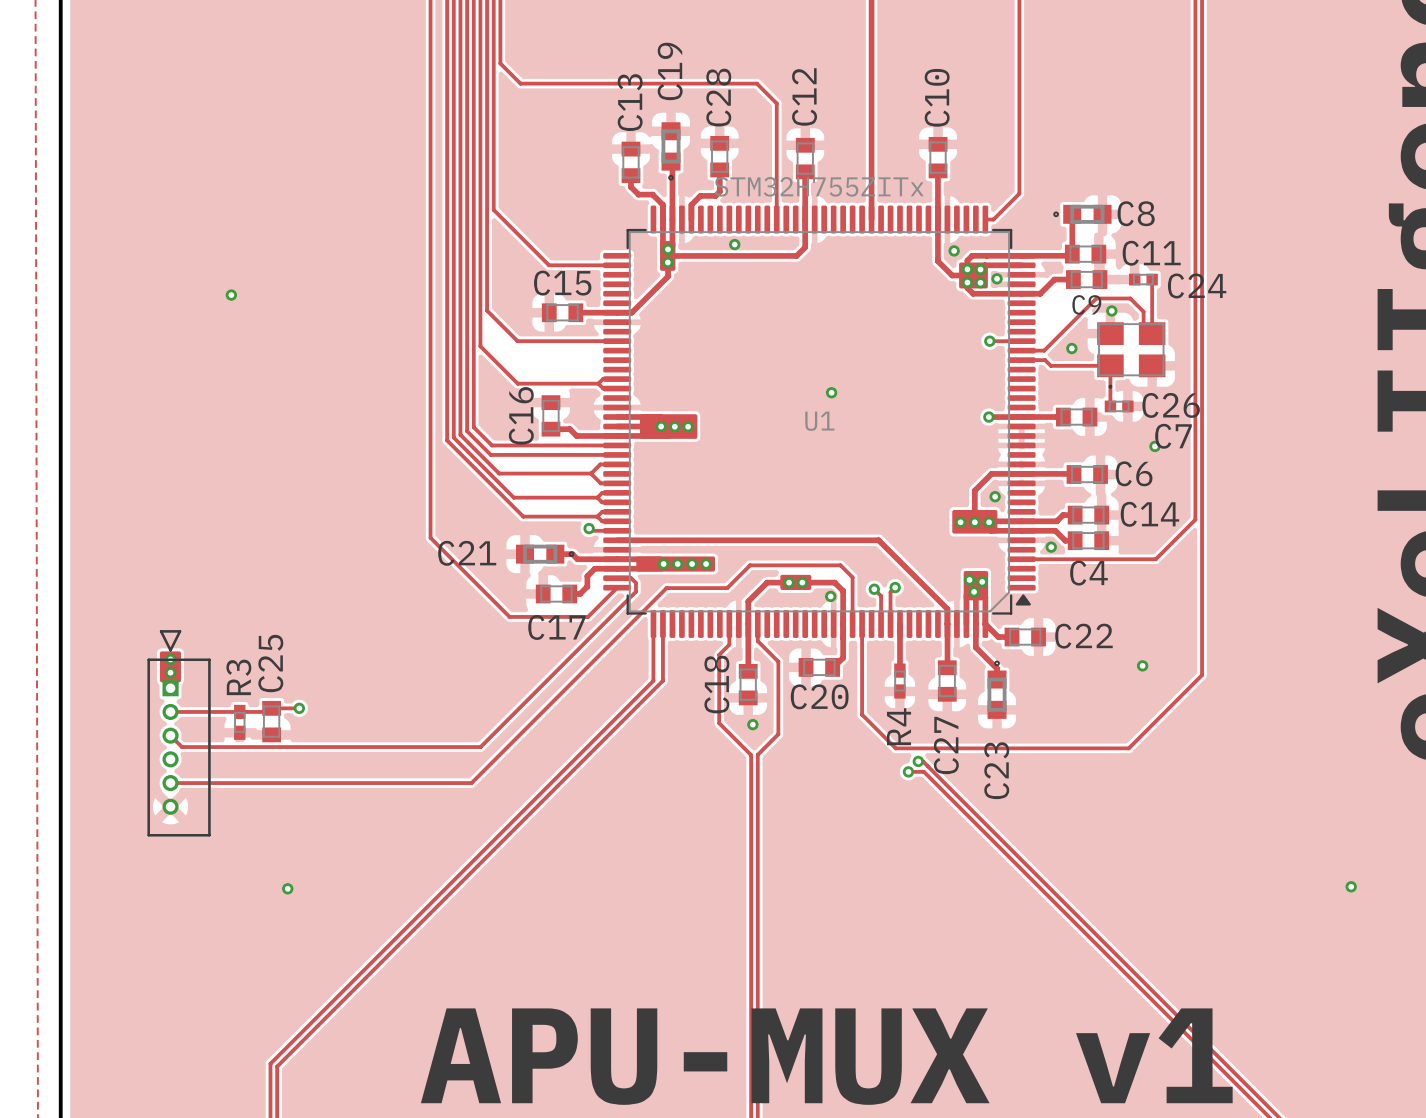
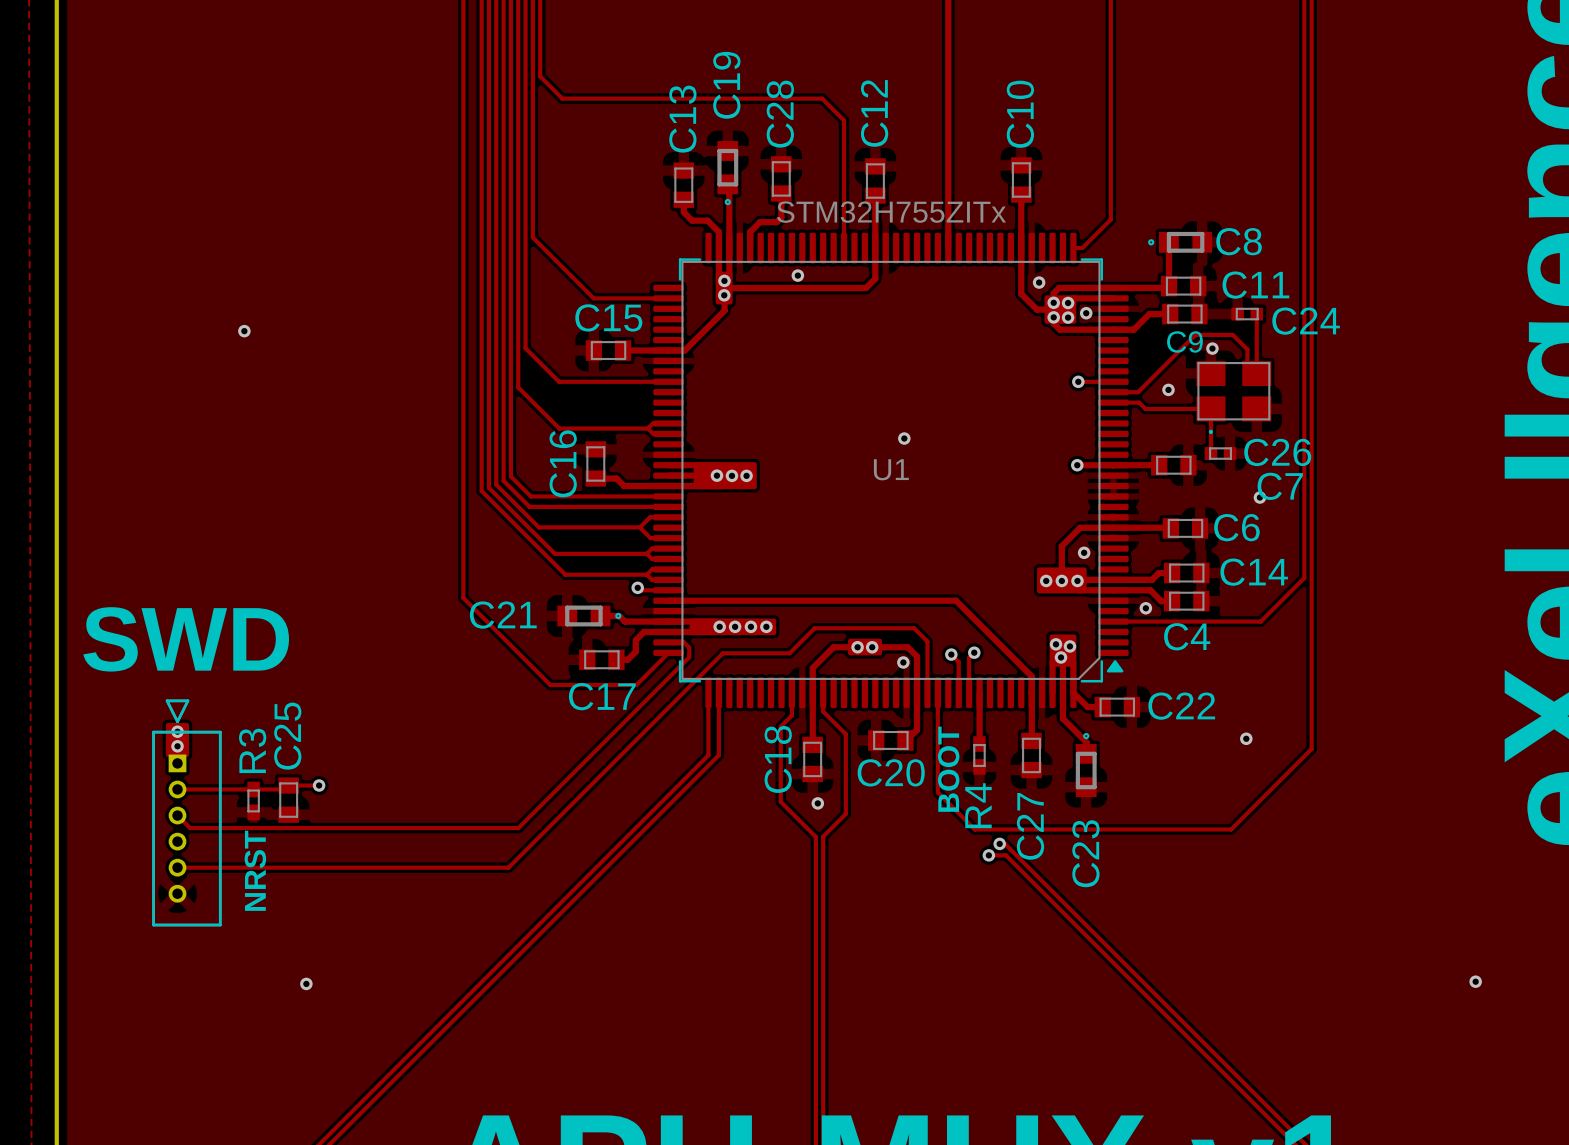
text: none -> SWD (186, 639)
text: none -> BOOT (948, 769)
text: none -> NRST (255, 870)

